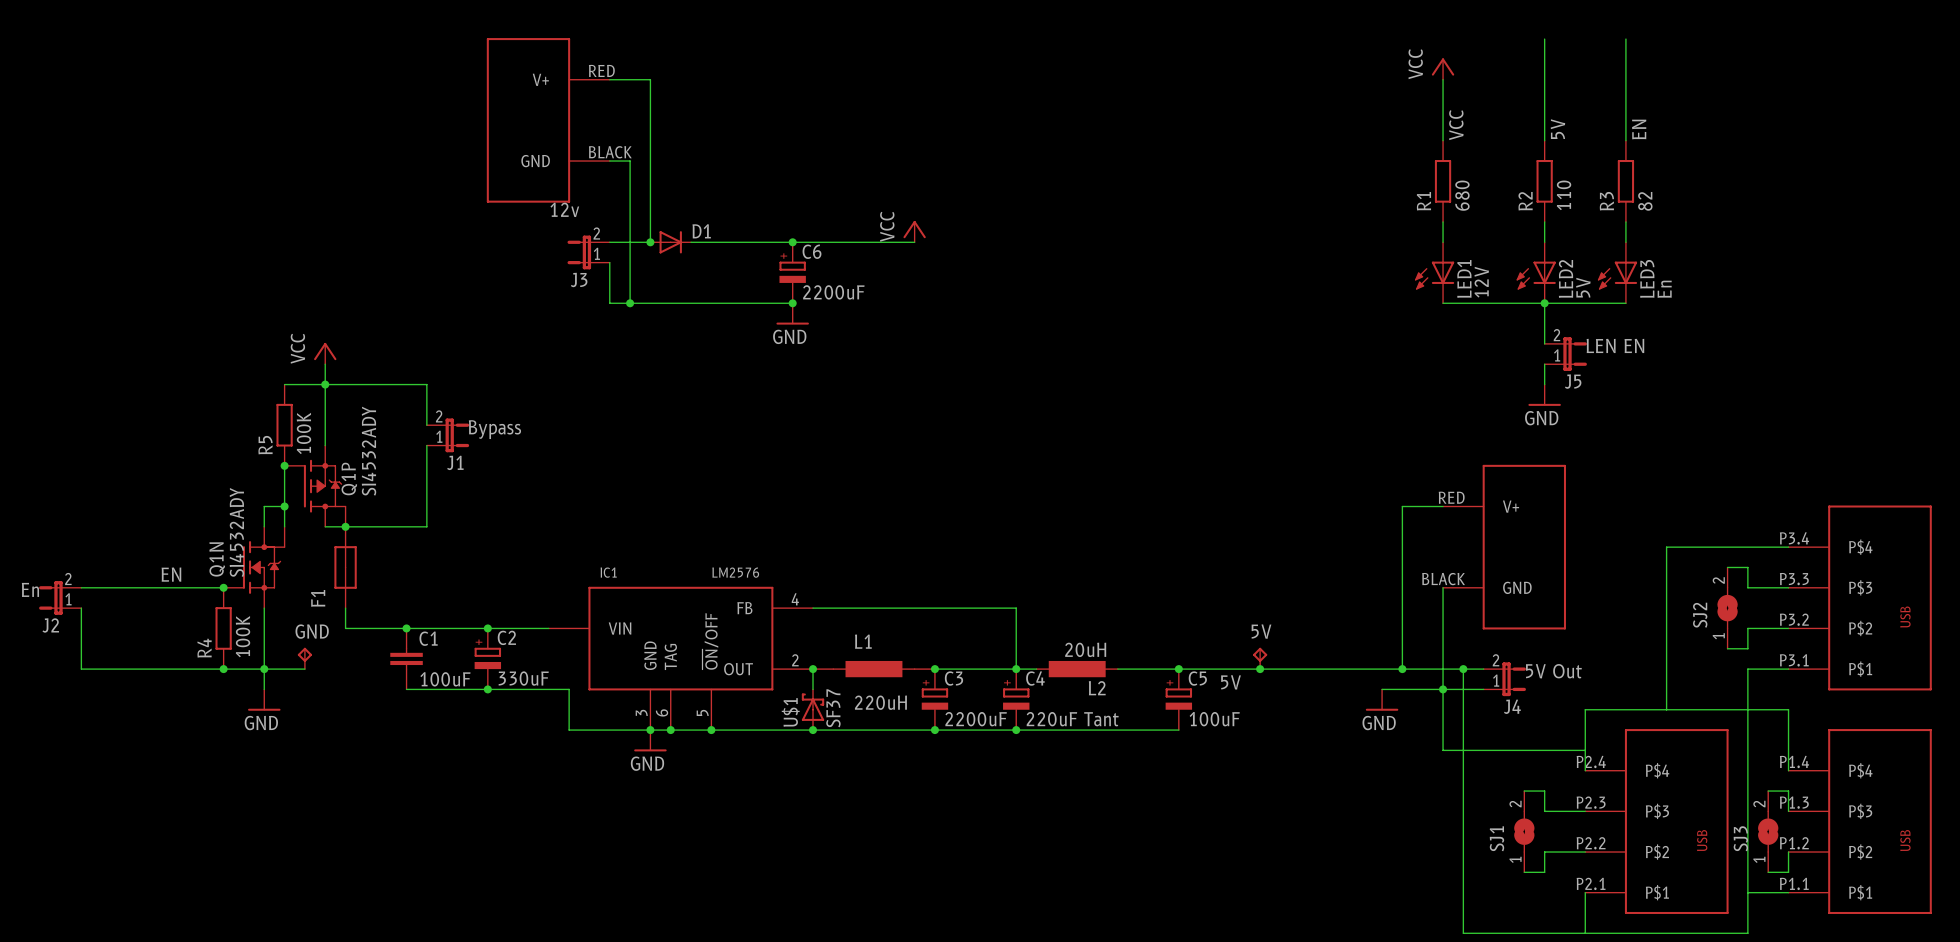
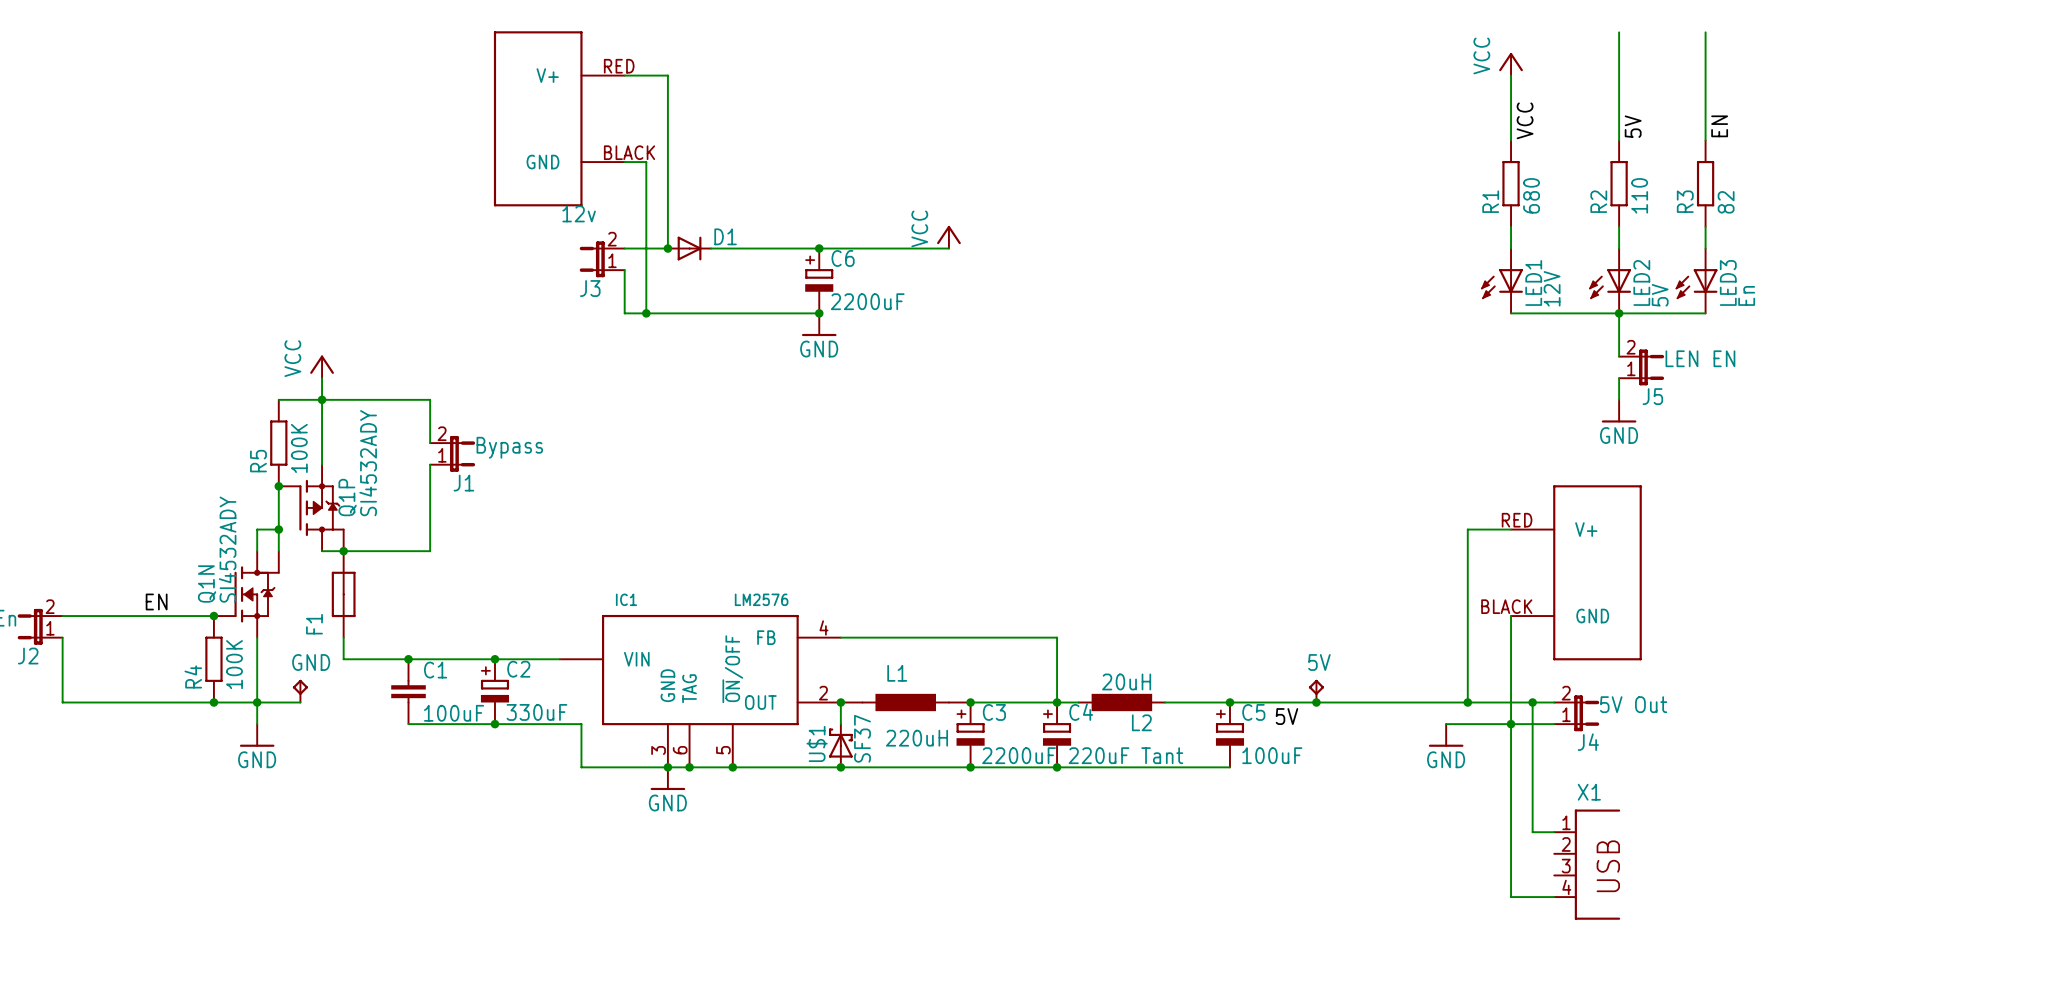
wire: (1788, 547) (1666, 547) (1666, 709) -> none
wire: (1727, 567) (1747, 567) (1747, 587) (1788, 587) -> none
part: (1860, 597) -> none
SJ2: (1727, 608) -> none
wire: (1788, 628) (1747, 628) (1747, 648) (1727, 648) -> none
wire: (1788, 669) (1747, 669) (1747, 933) (1463, 933) (1463, 791) -> (1554, 832) (1532, 832)
wire: (1443, 750) (1585, 750) -> (1511, 788) (1511, 897) (1554, 897)
wire: (1585, 770) (1585, 709) (1788, 709) (1788, 770) -> none
wire: (1524, 791) (1544, 791) (1544, 811) (1585, 811) -> none
wire: (1768, 791) (1788, 791) (1788, 811) -> none
X1: none -> (1587, 864)
part: (1656, 821) -> none
part: (1860, 821) -> none
SJ1: (1524, 831) -> none
SJ3: (1768, 831) -> none
wire: (1585, 852) (1544, 852) (1544, 872) (1524, 872) -> none
wire: (1788, 852) (1788, 872) (1768, 872) -> none
wire: (1585, 892) (1585, 933) -> none
wire: (1747, 892) (1788, 892) -> none

